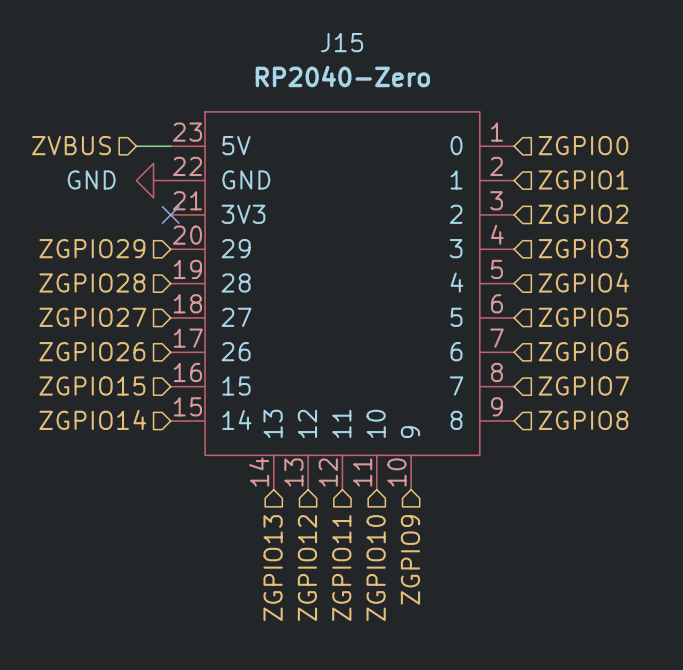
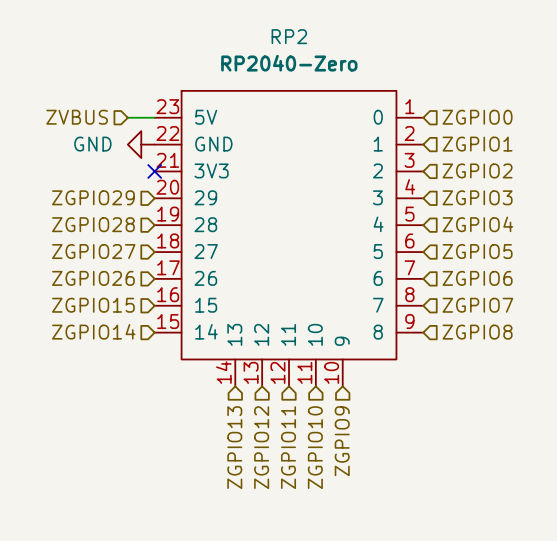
J15 name: J15 (342, 42) -> RP2 (289, 36)

